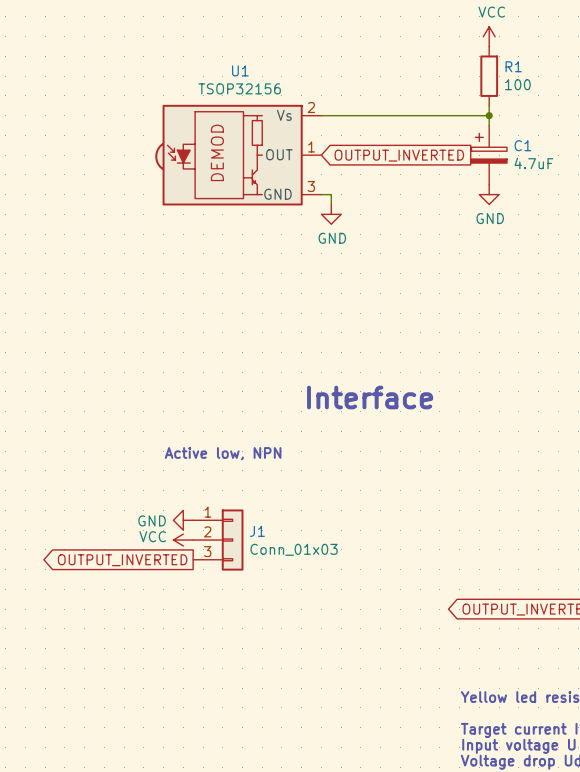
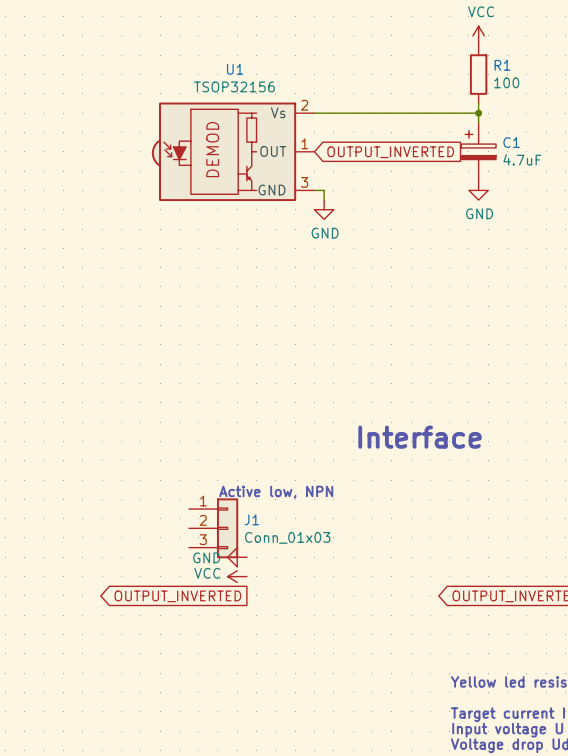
text position: Interface (370, 397) -> Interface (420, 437)
text position: Active low, NPN (223, 453) -> Active low, NPN (276, 492)
power symbol position: GND (183, 520) -> GND (237, 557)
power symbol position: VCC (183, 540) -> VCC (237, 576)
global label position: OUTPUT_INVERTED (122, 560) -> OUTPUT_INVERTED (177, 596)

